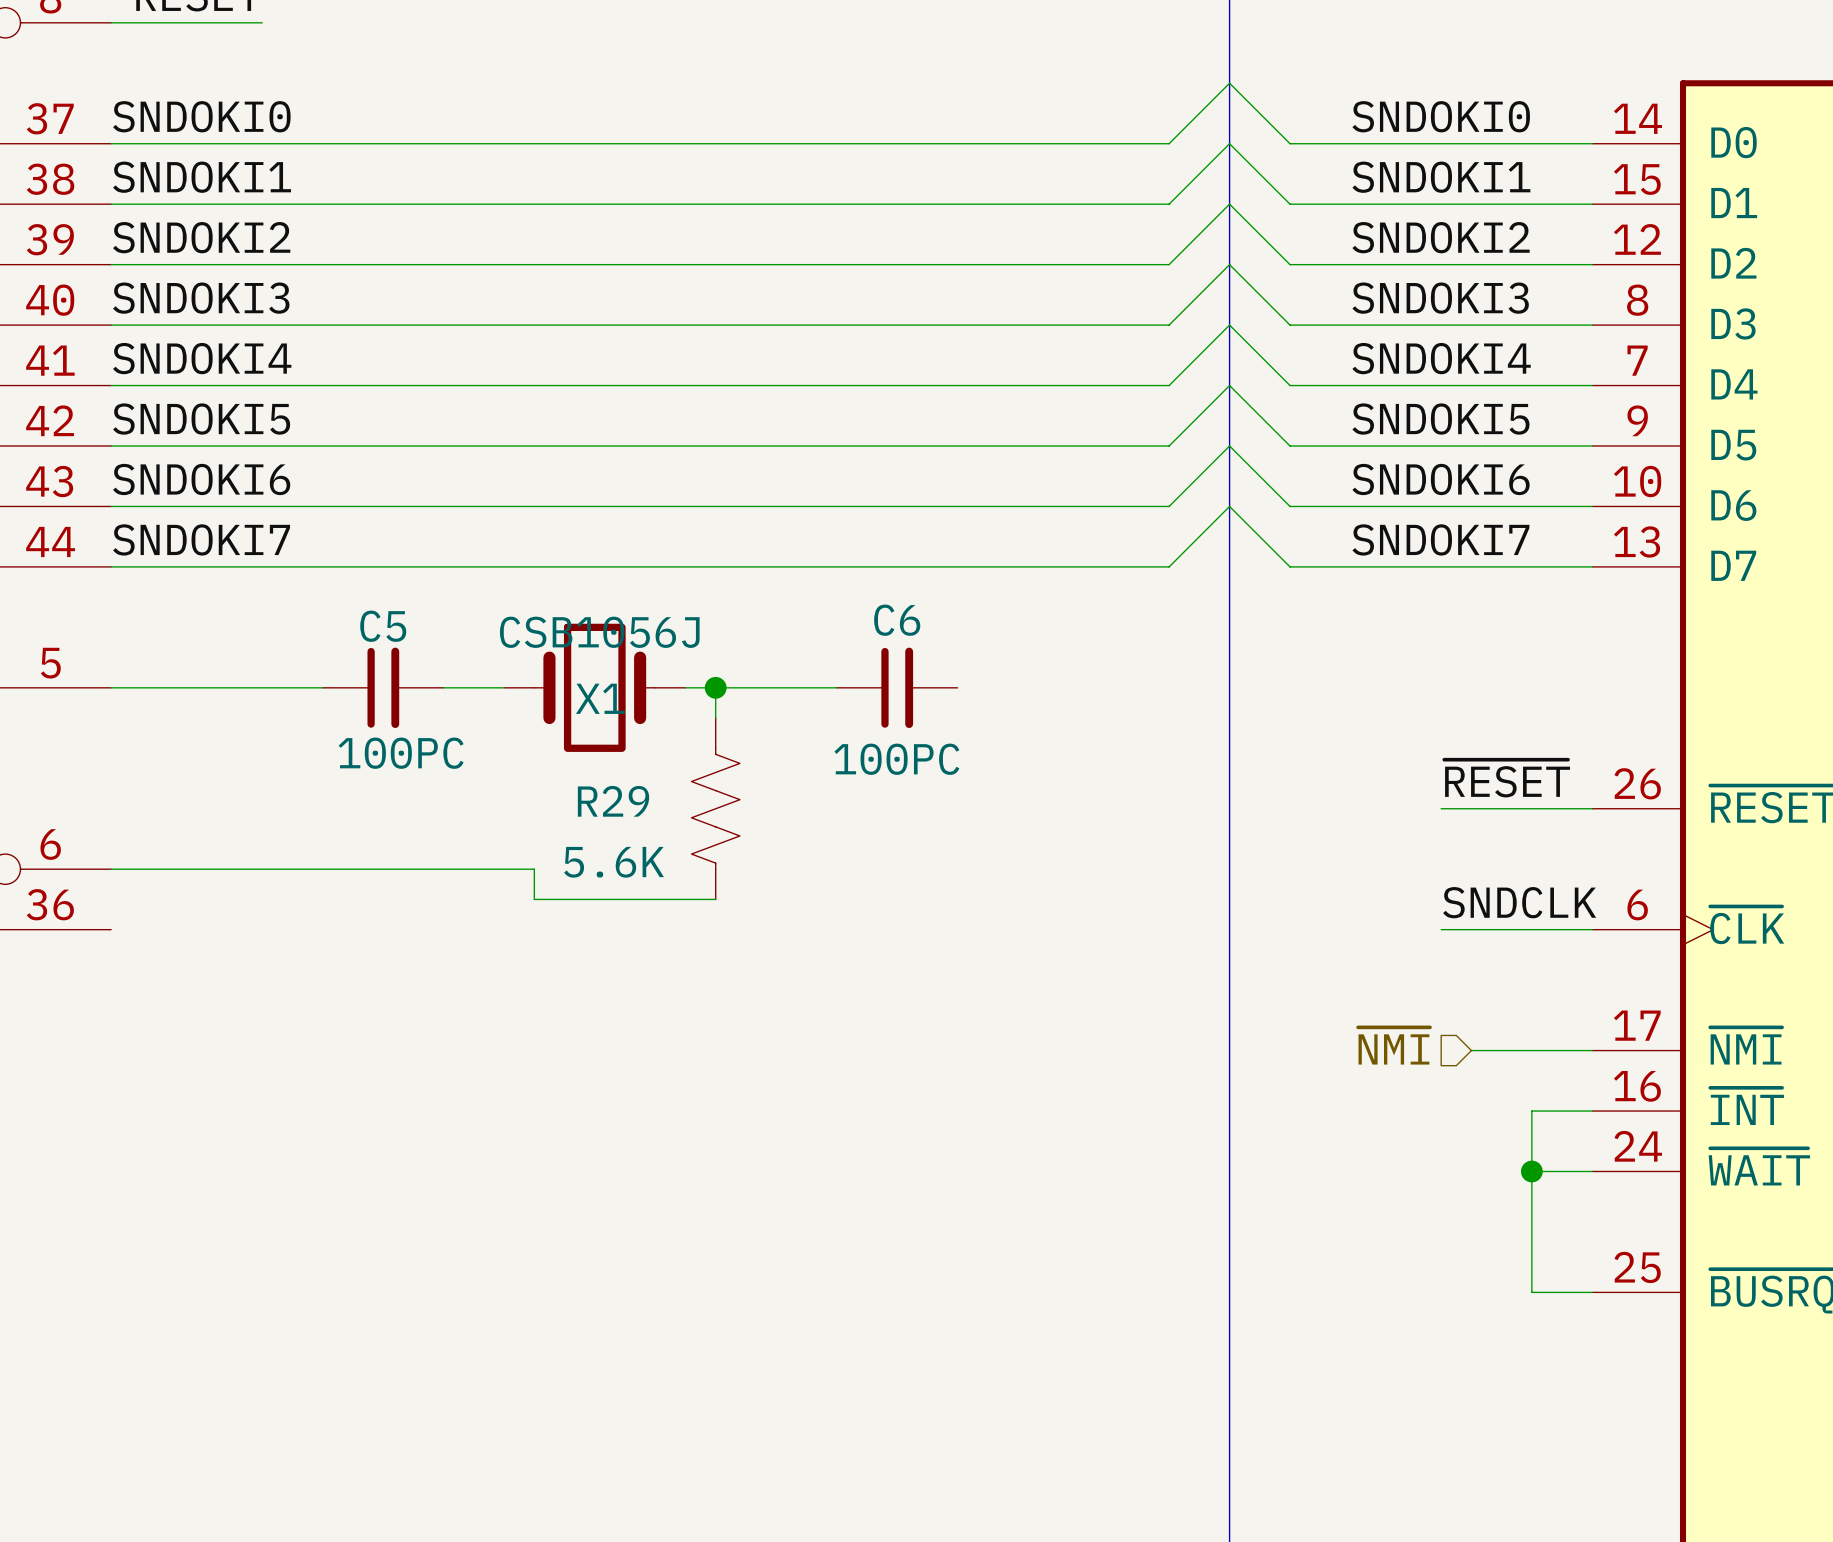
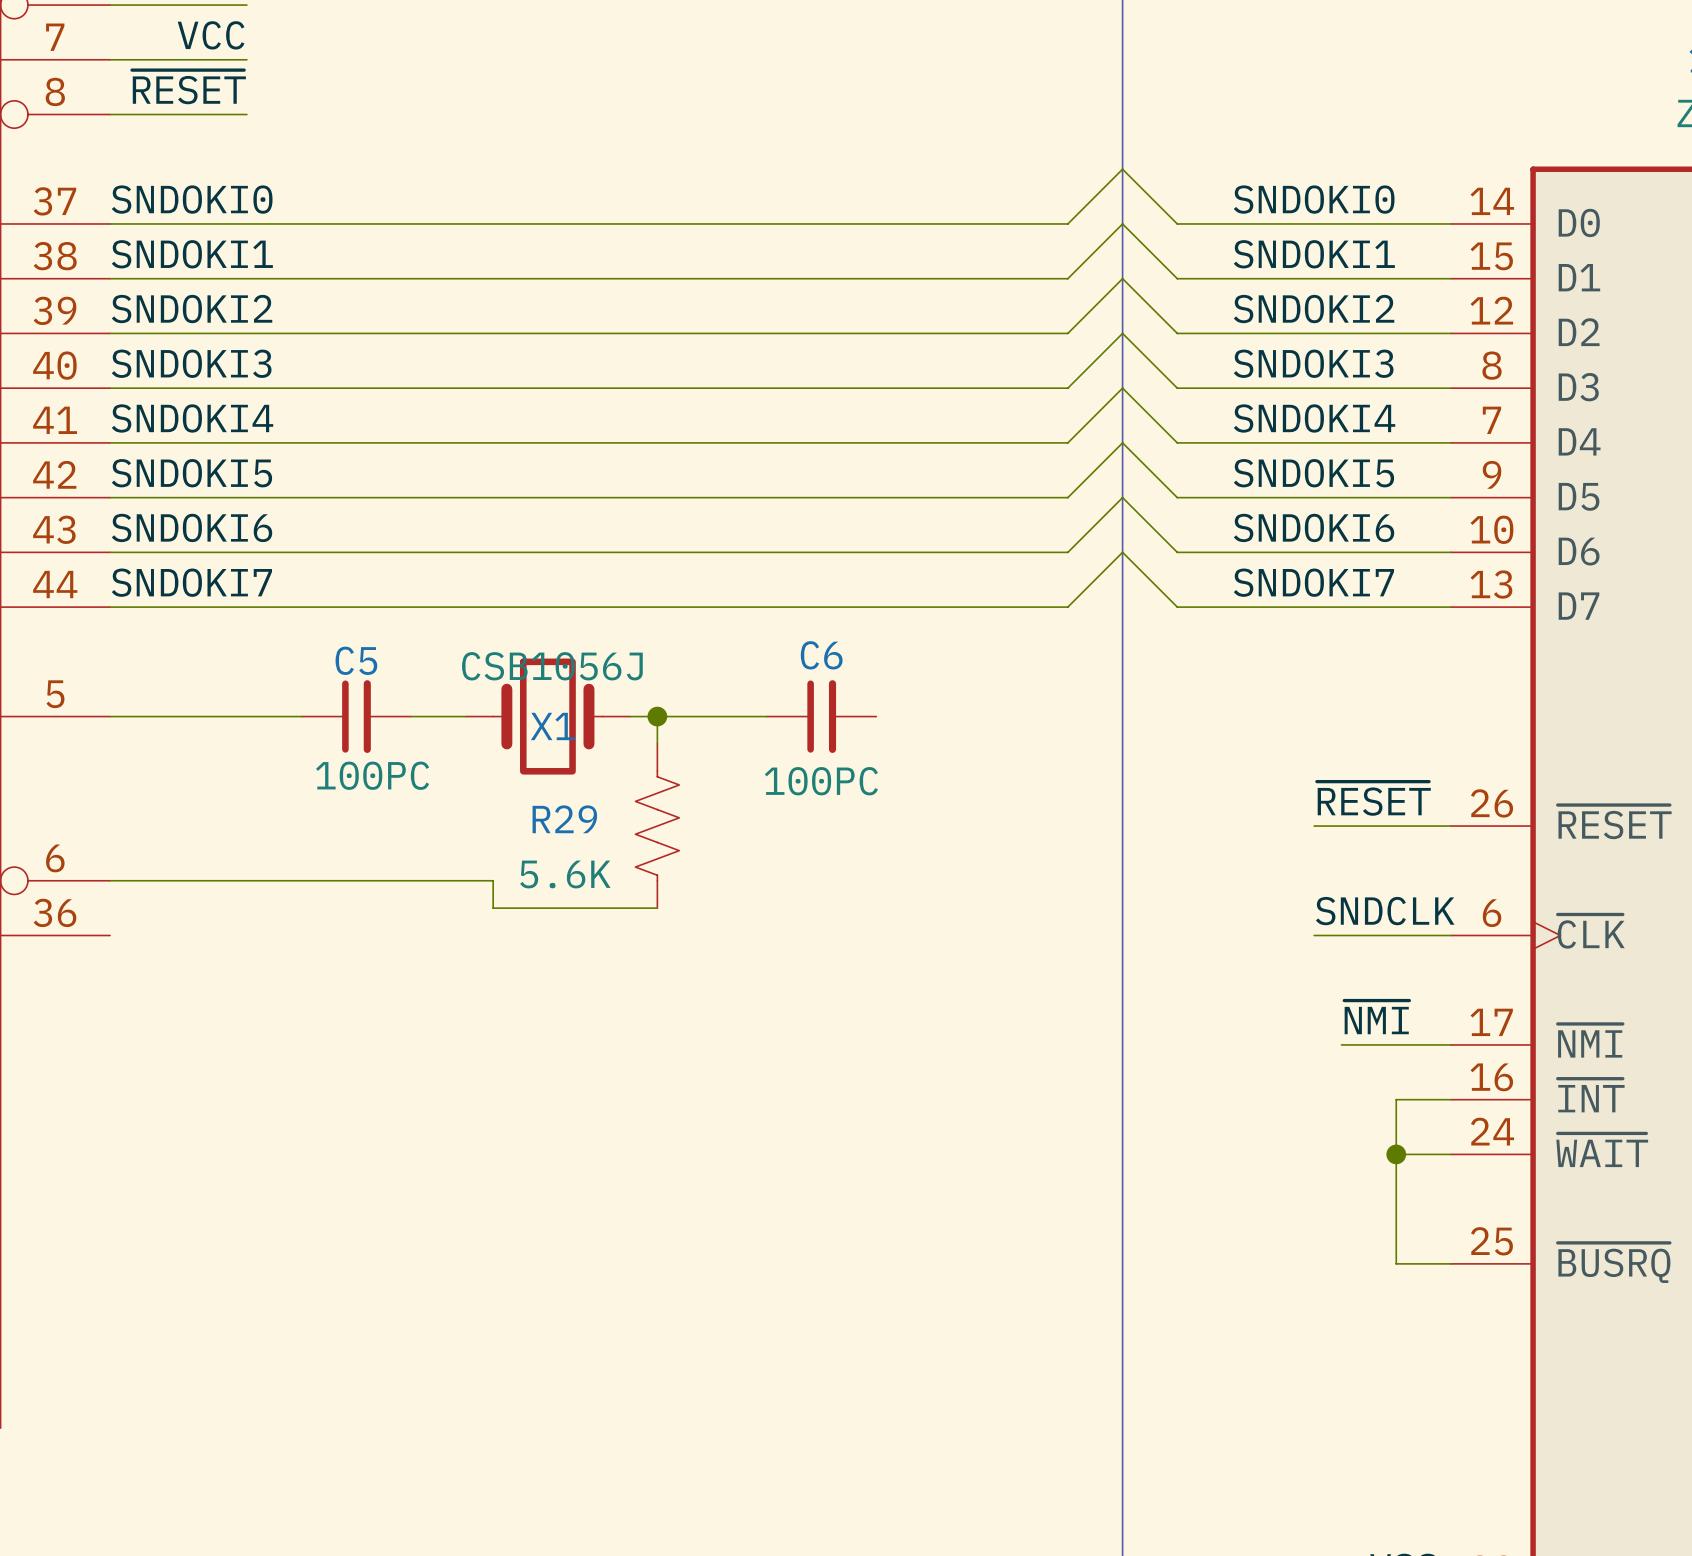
label: none -> ~{NMI} (1376, 1017)
hierarchical label: ~{NMI} (1394, 1045) -> none

